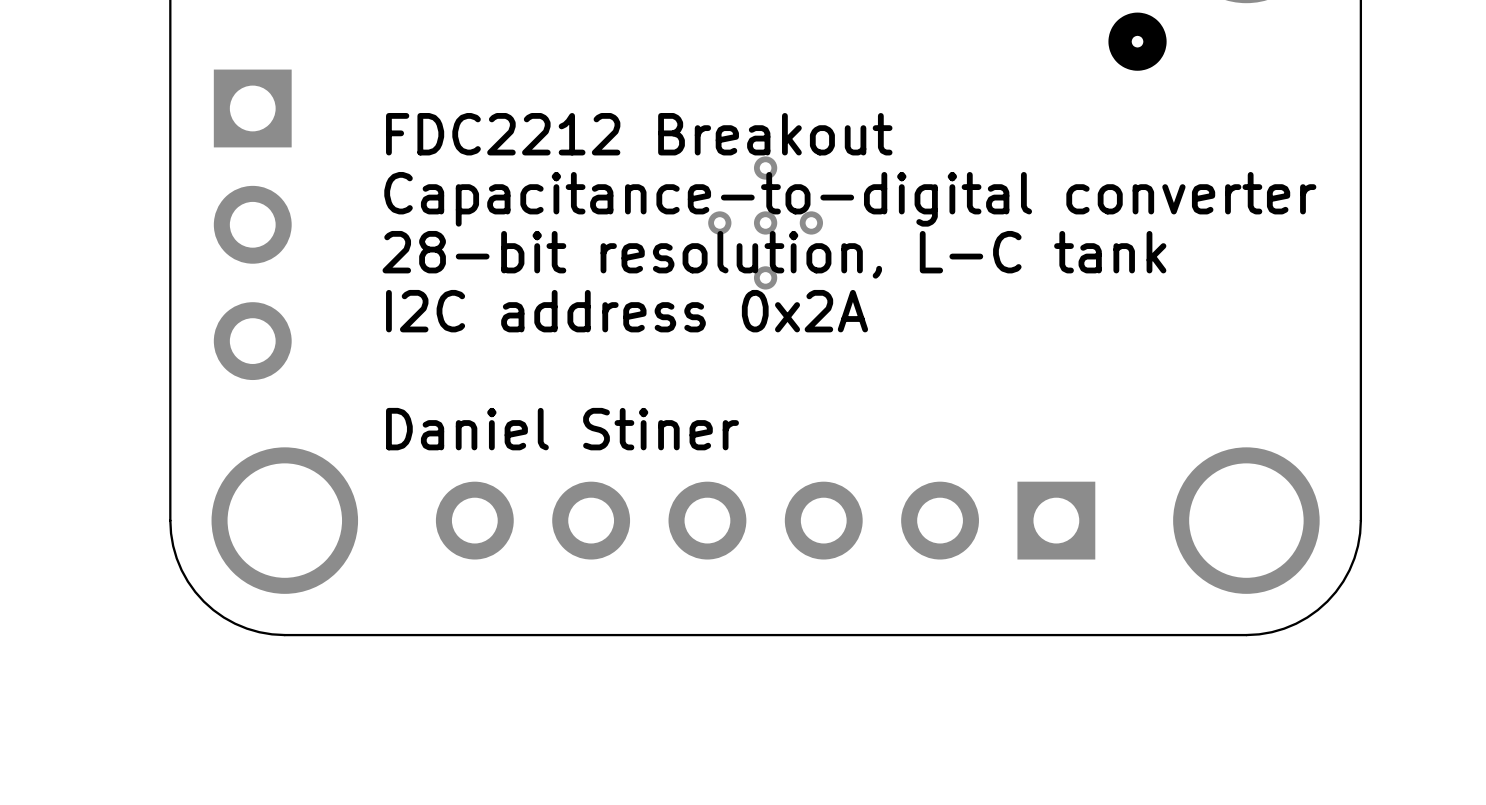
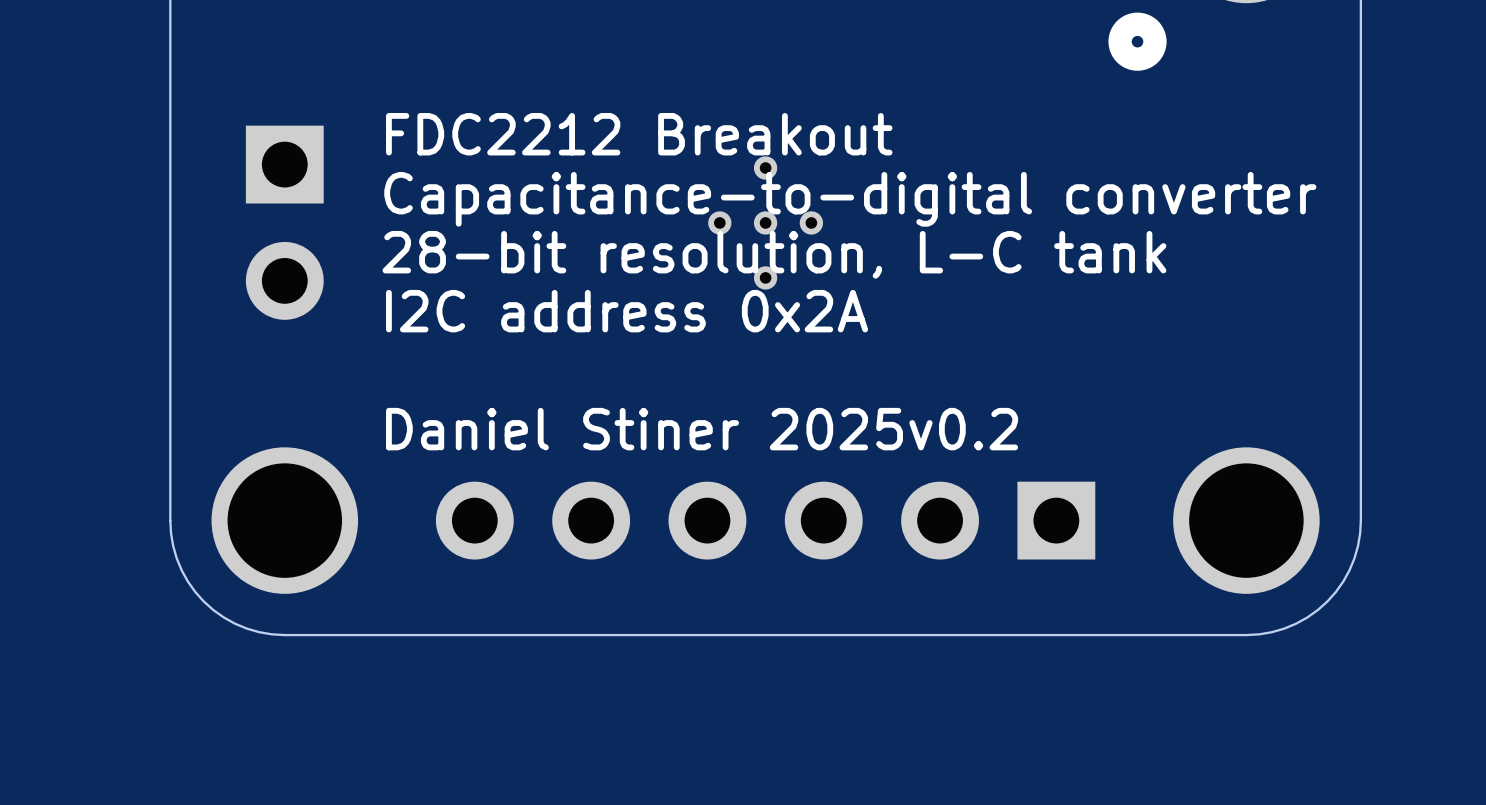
part footprint: [213, 69, 292, 381] -> [245, 125, 324, 320]
text: Daniel Stiner (562, 429) -> Daniel Stiner 2025v0.2 (702, 429)

